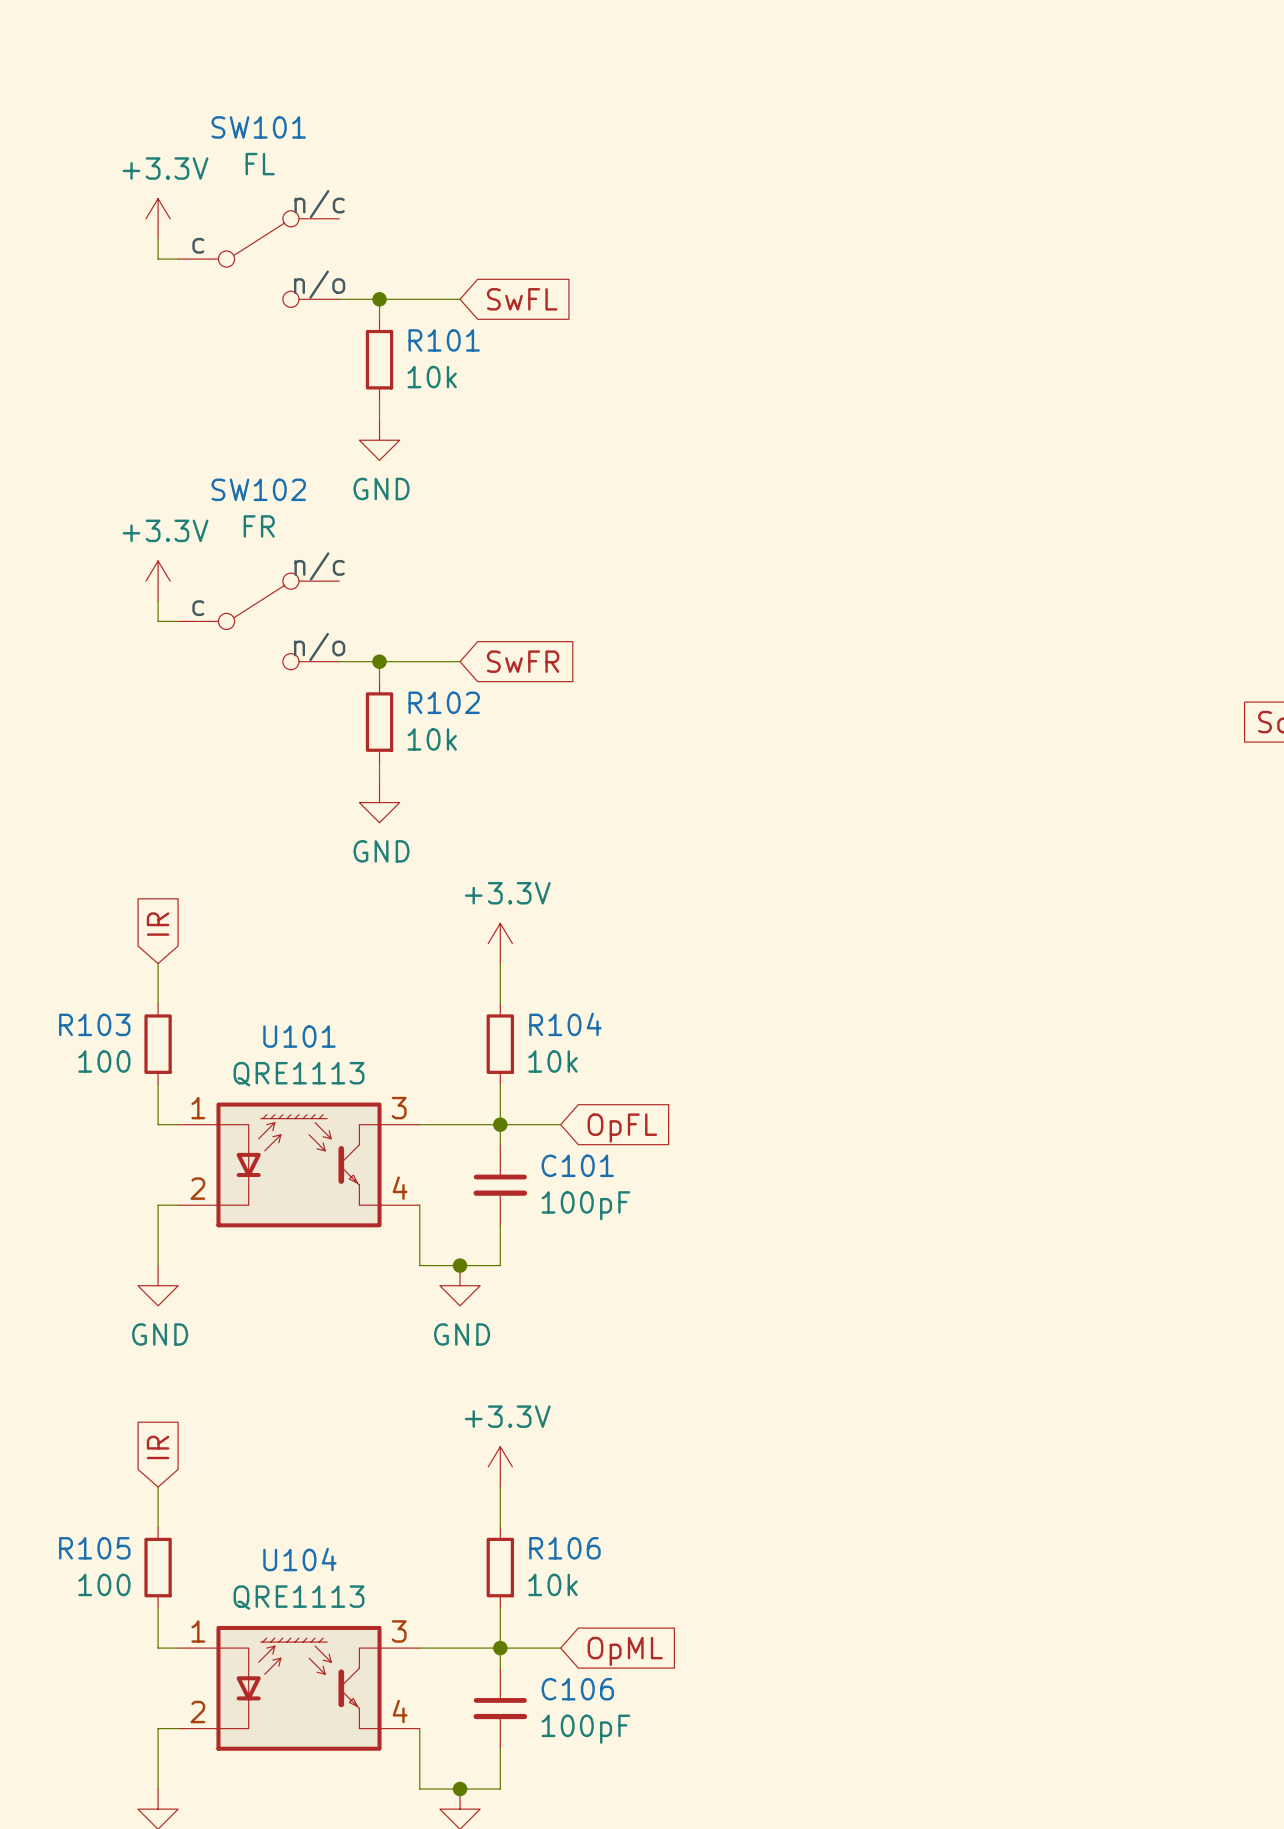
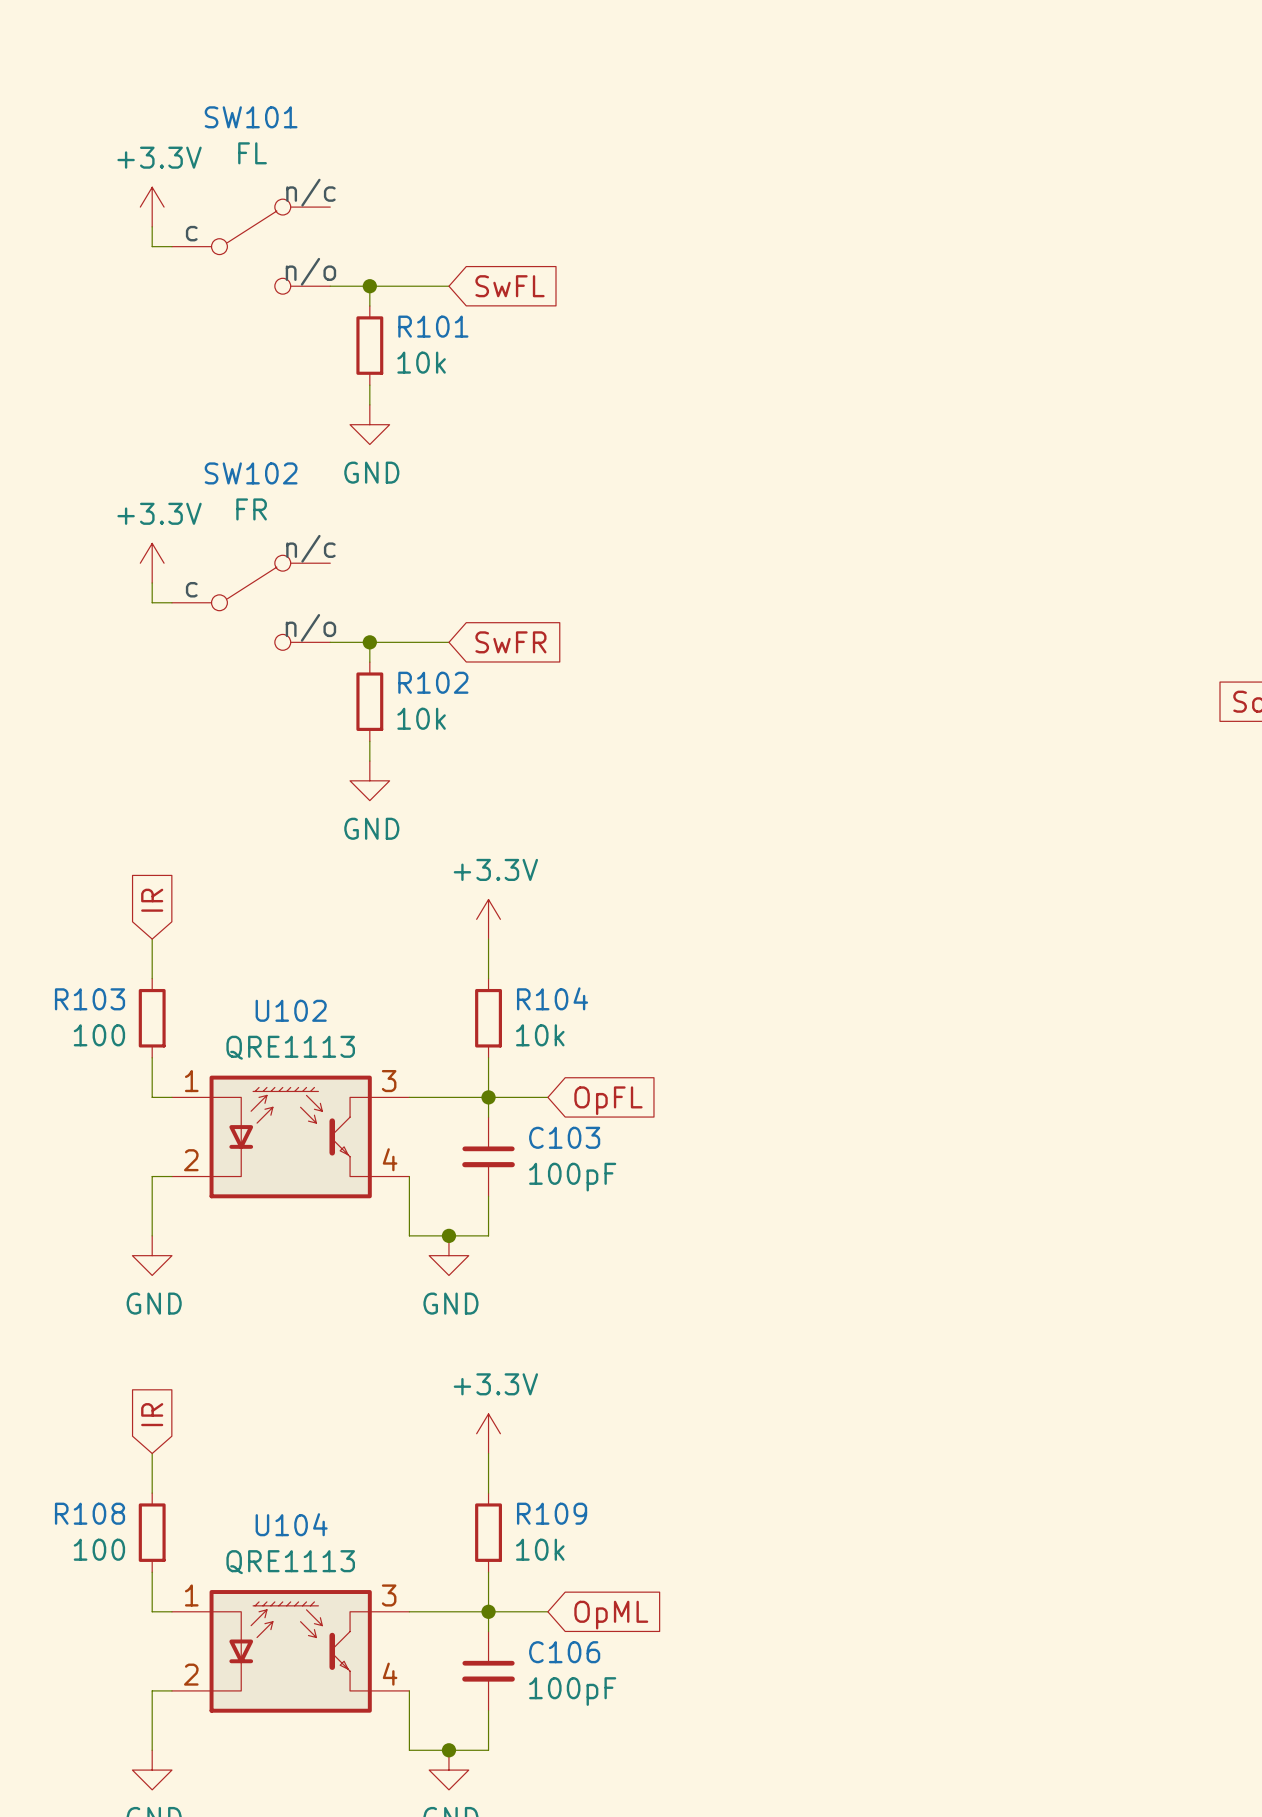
U101 name: U101 (299, 1036) -> U102 (291, 1010)
C101 name: C101 (577, 1165) -> C103 (564, 1137)
R105 name: R105 (94, 1548) -> R108 (90, 1513)
R106 name: R106 (564, 1548) -> R109 (552, 1513)

